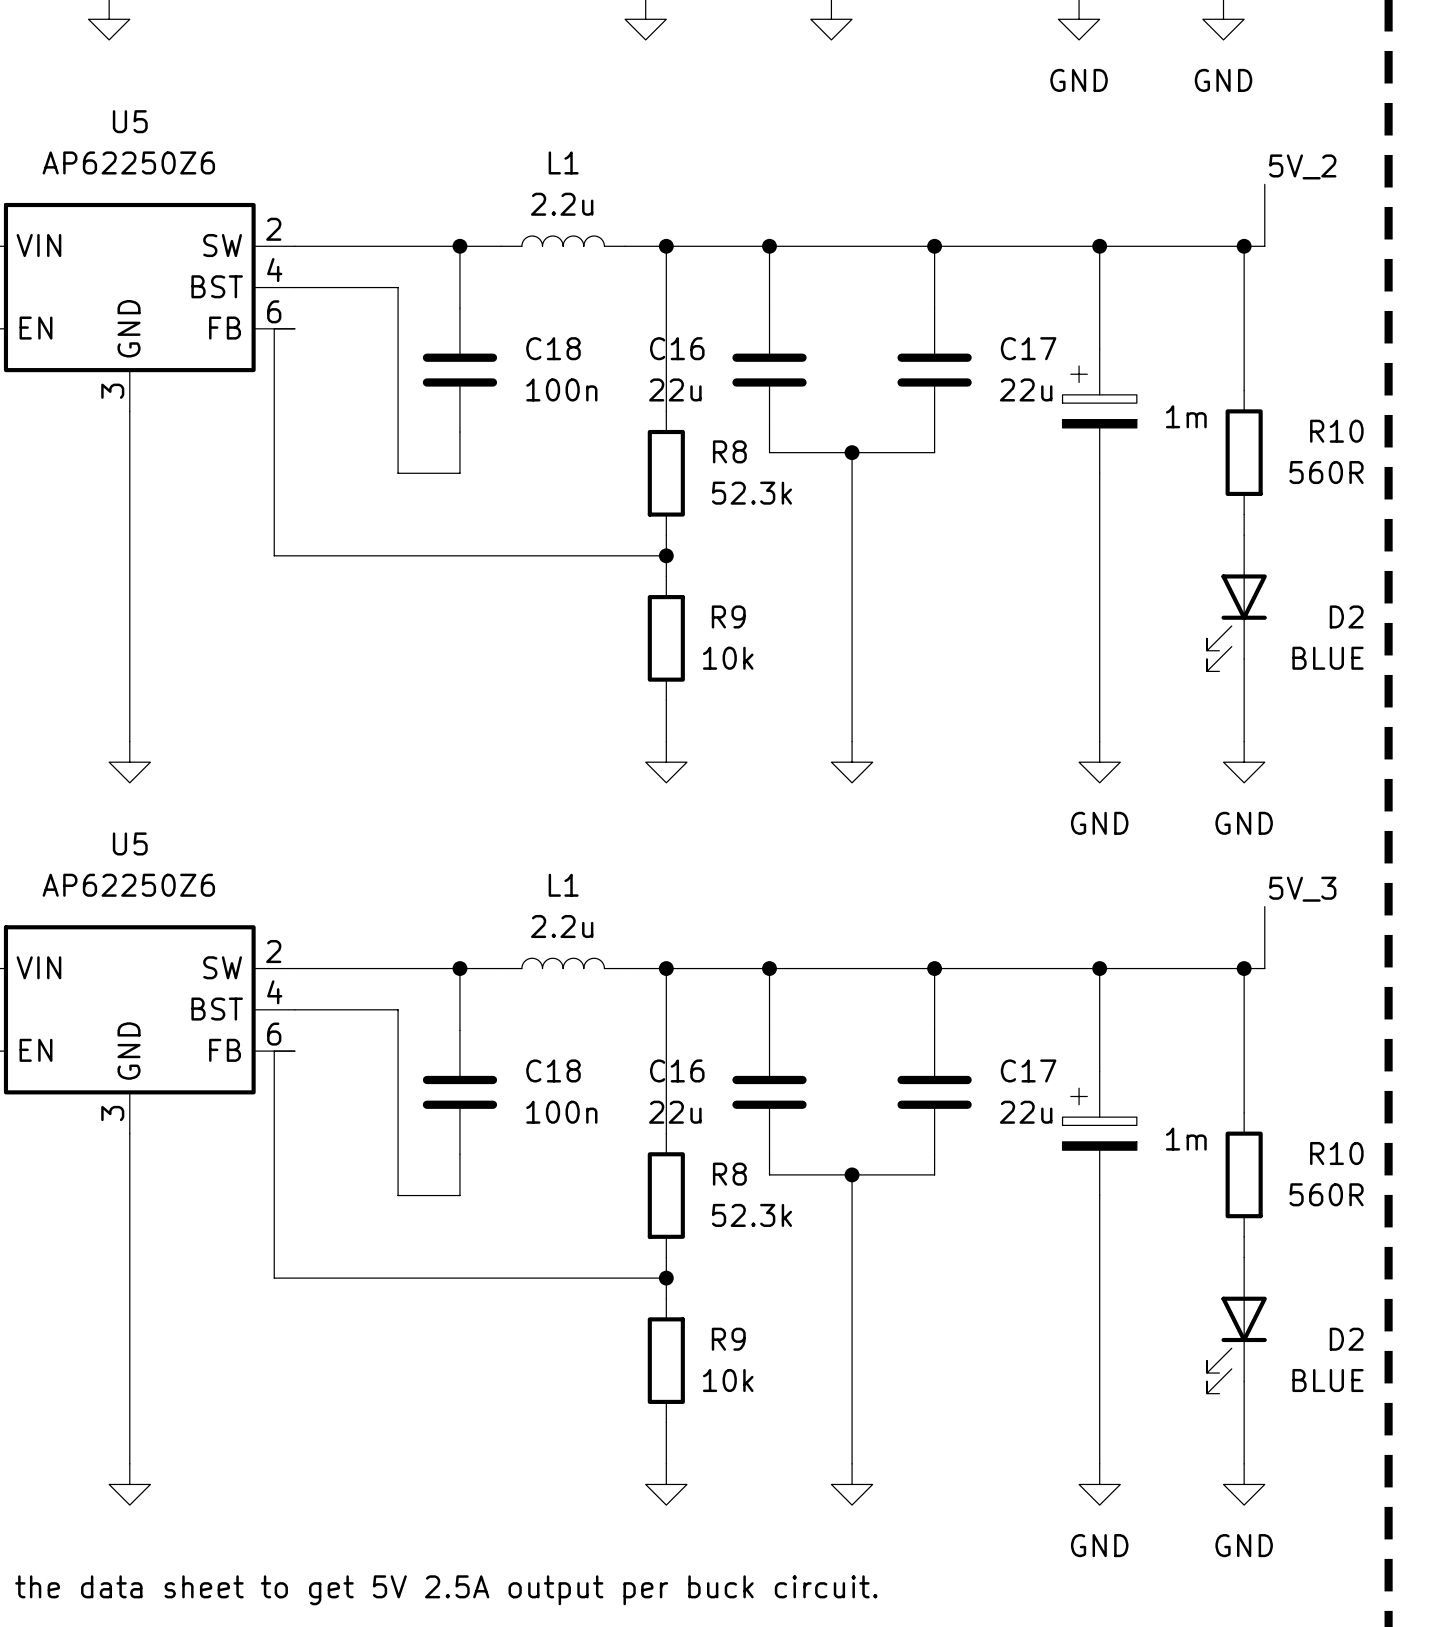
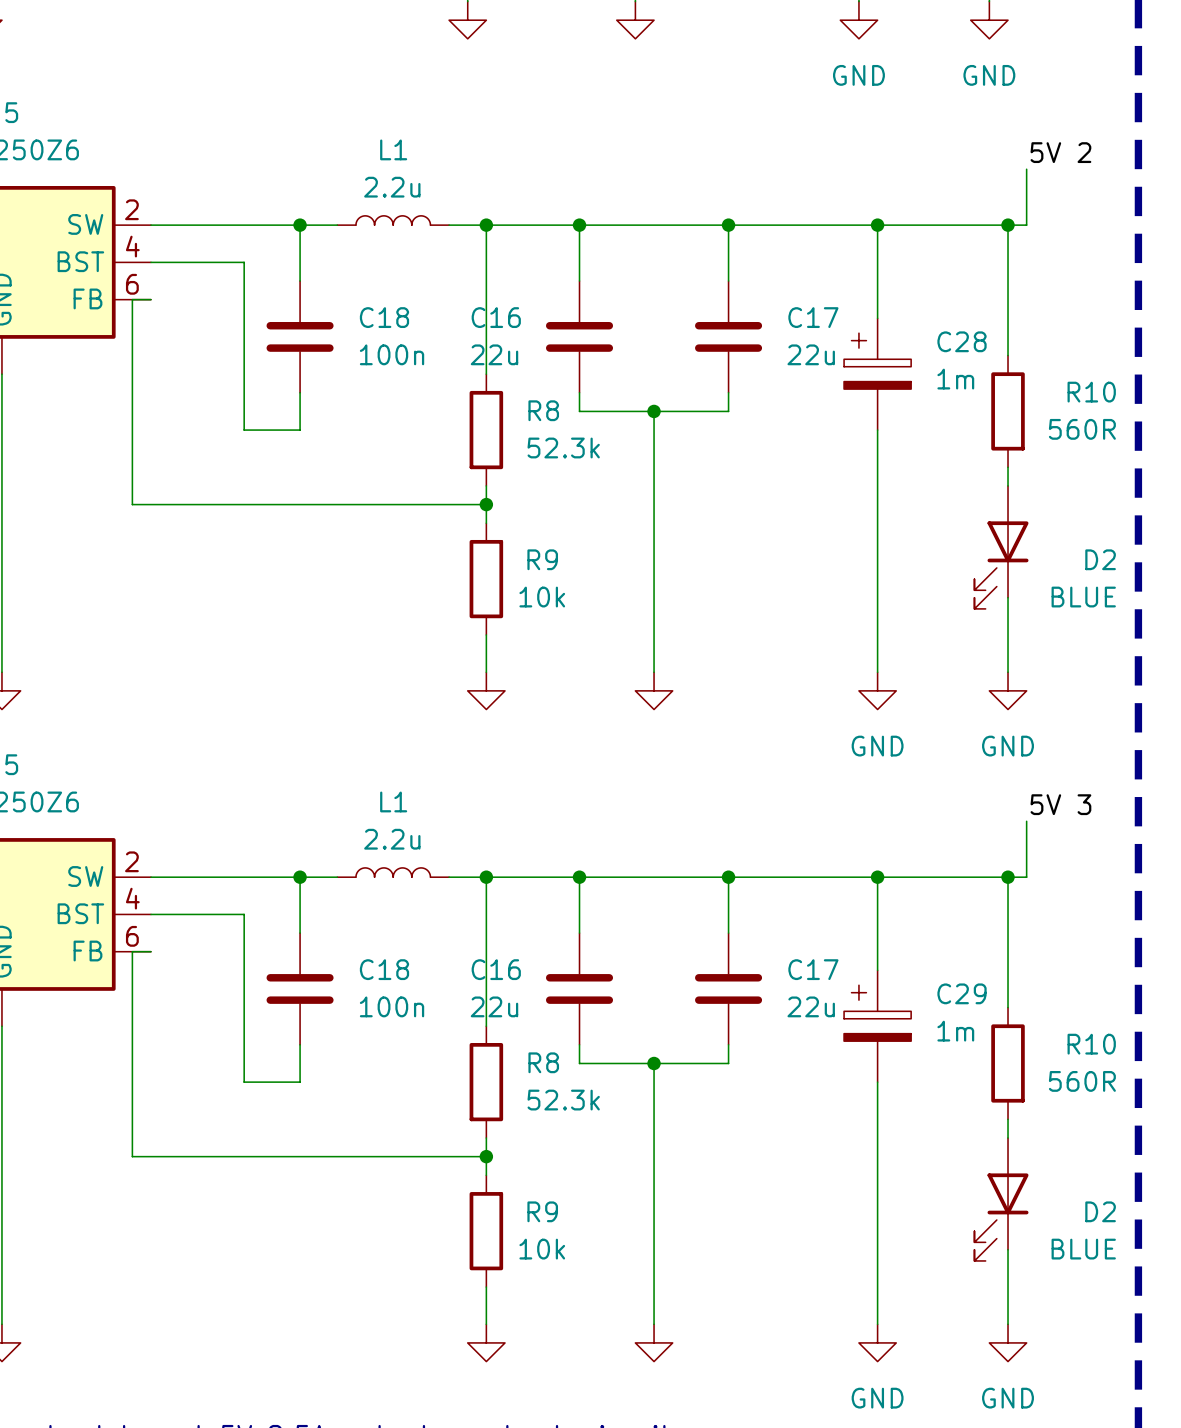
label: 5V_2 (1302, 166) -> 5V 2 (1060, 152)
C28 name: none -> C28 (962, 341)
label: 5V_3 (1302, 889) -> 5V 3 (1060, 804)
C29 name: none -> C29 (962, 993)

